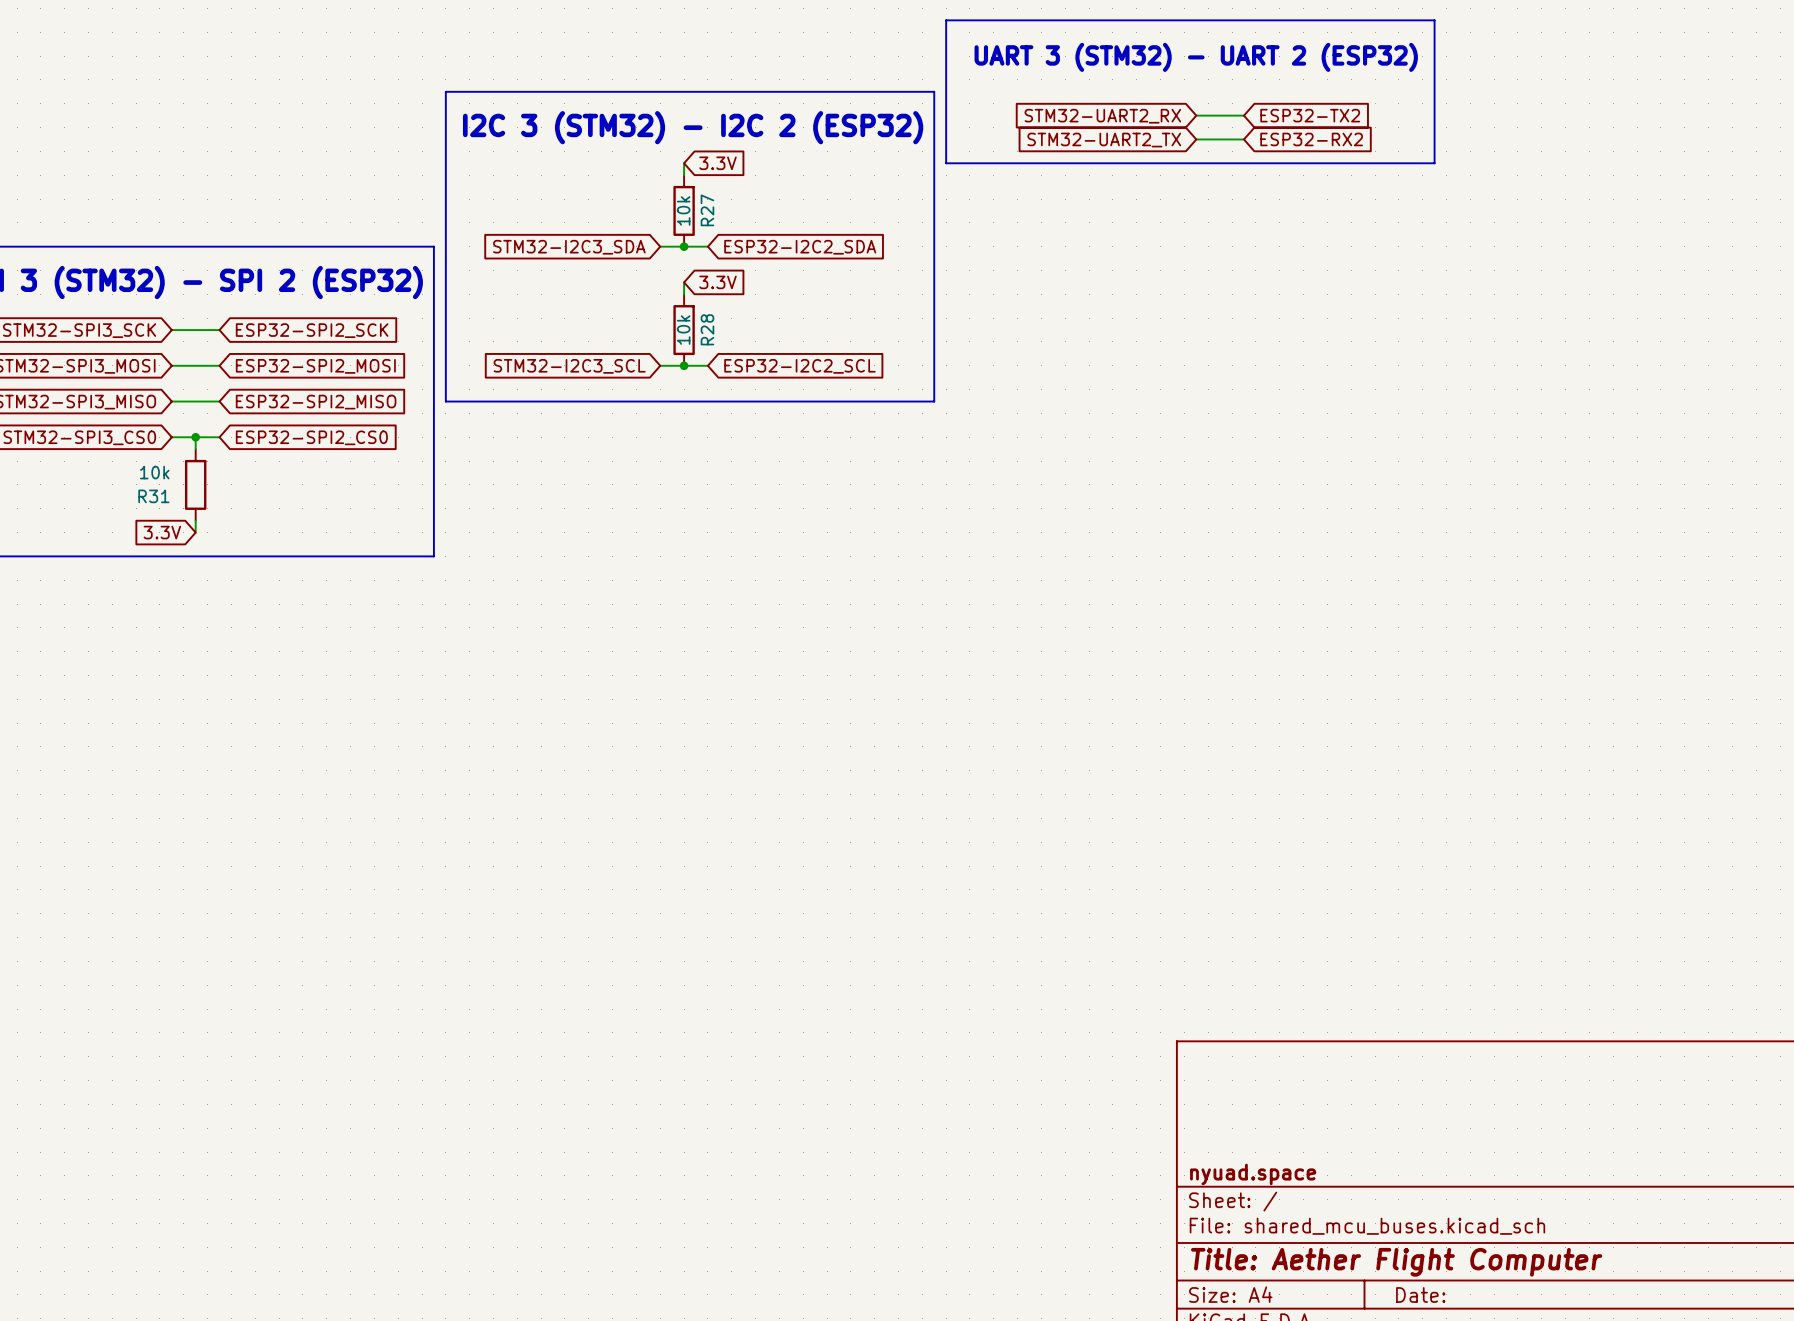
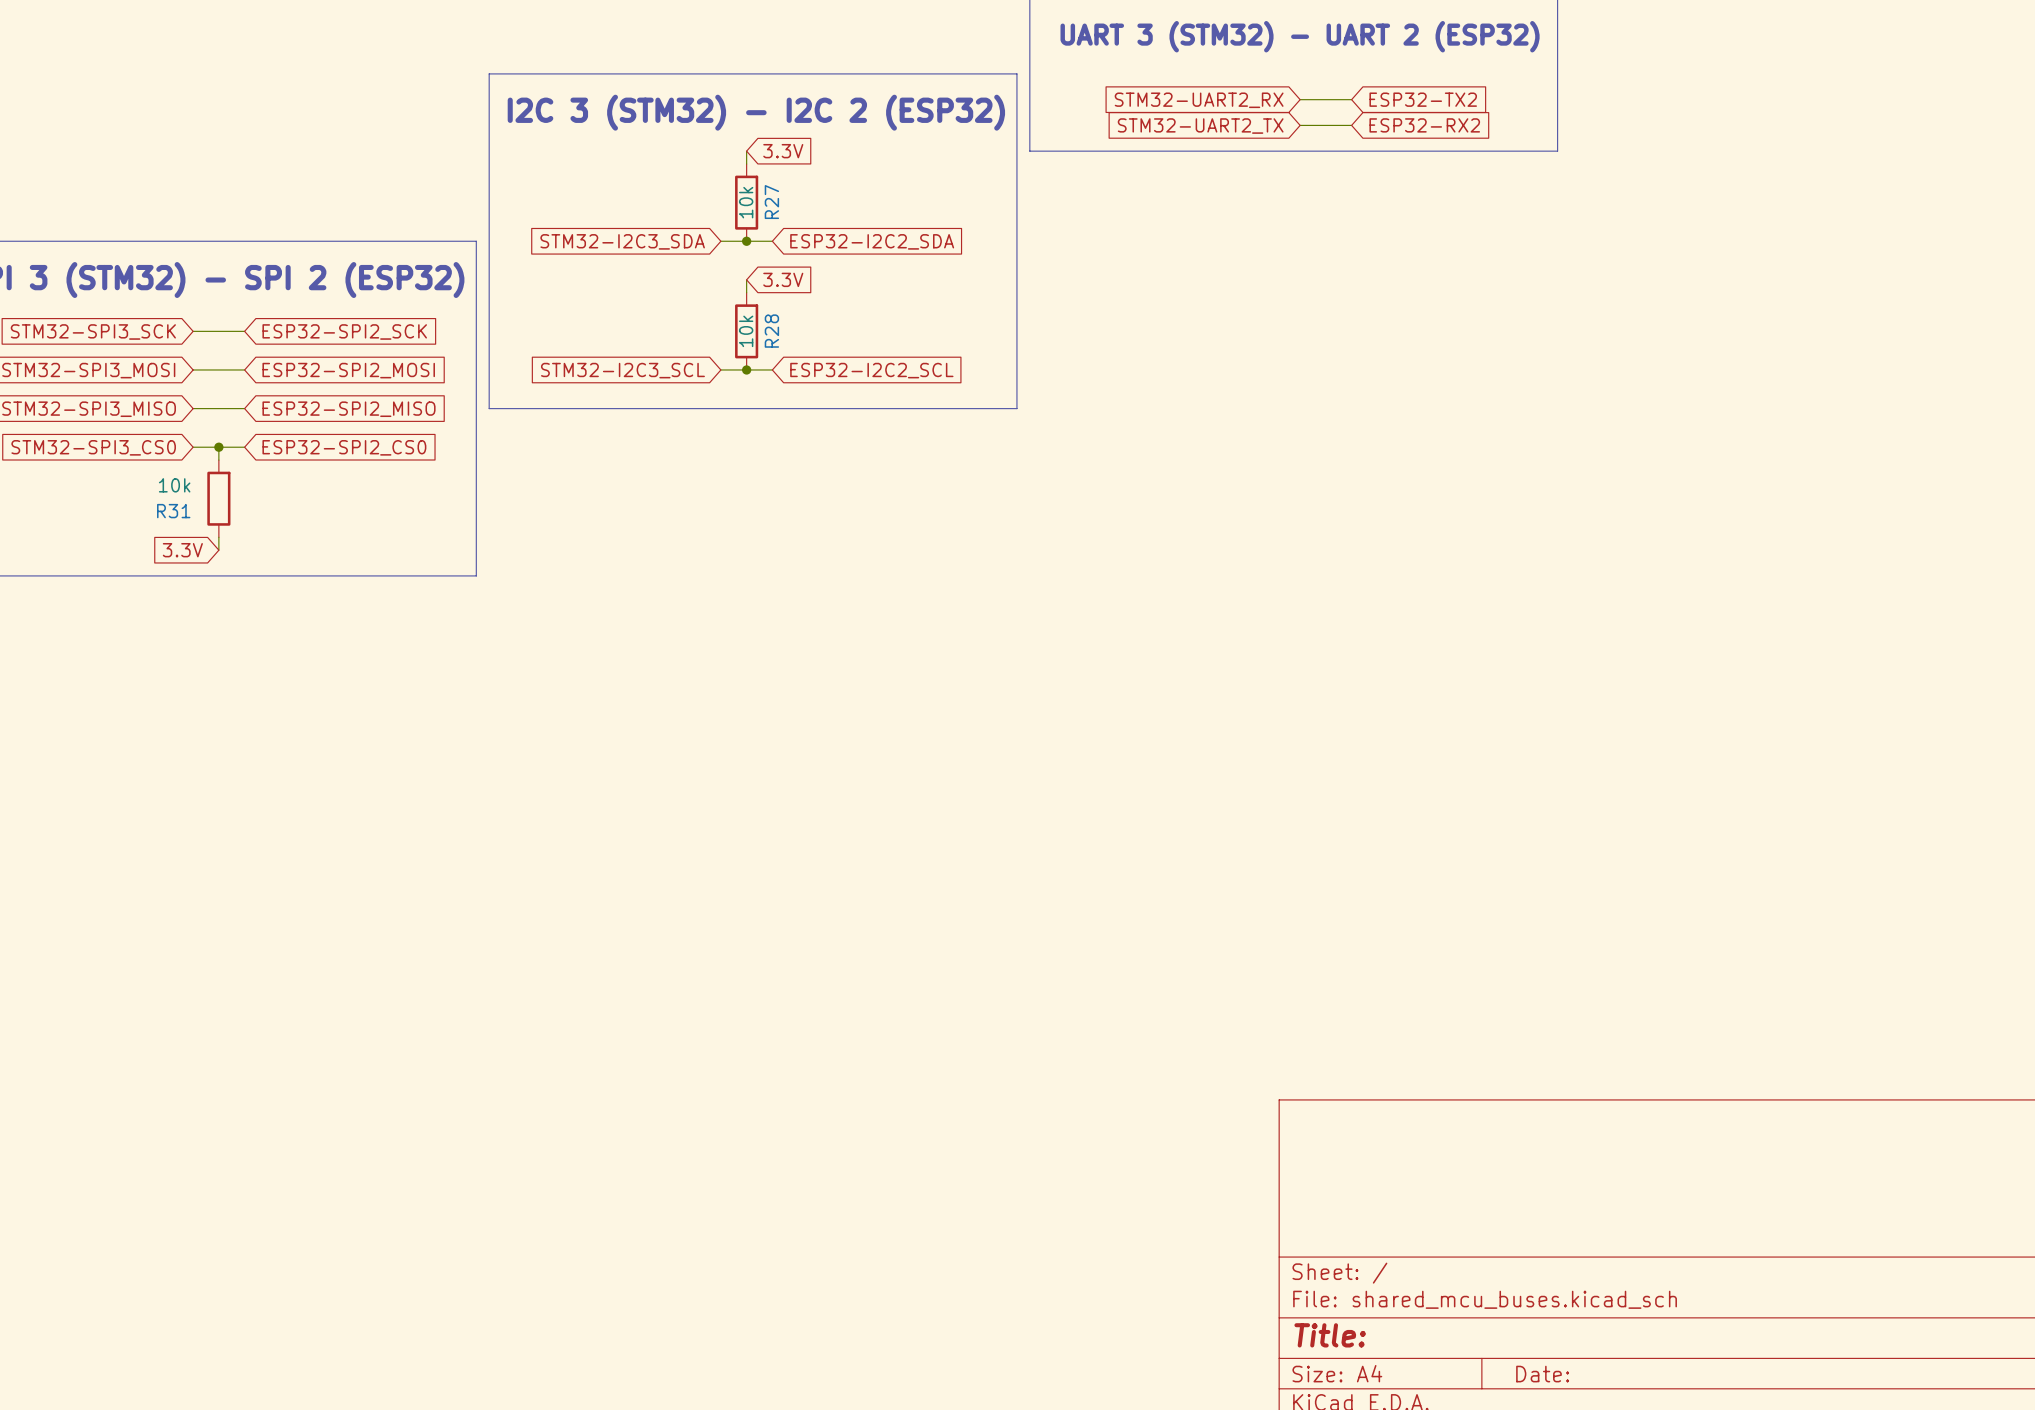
title block: nyuad.space (1253, 1174) -> none
title block: Title: Aether Flight Computer (1396, 1262) -> Title: (1330, 1335)

